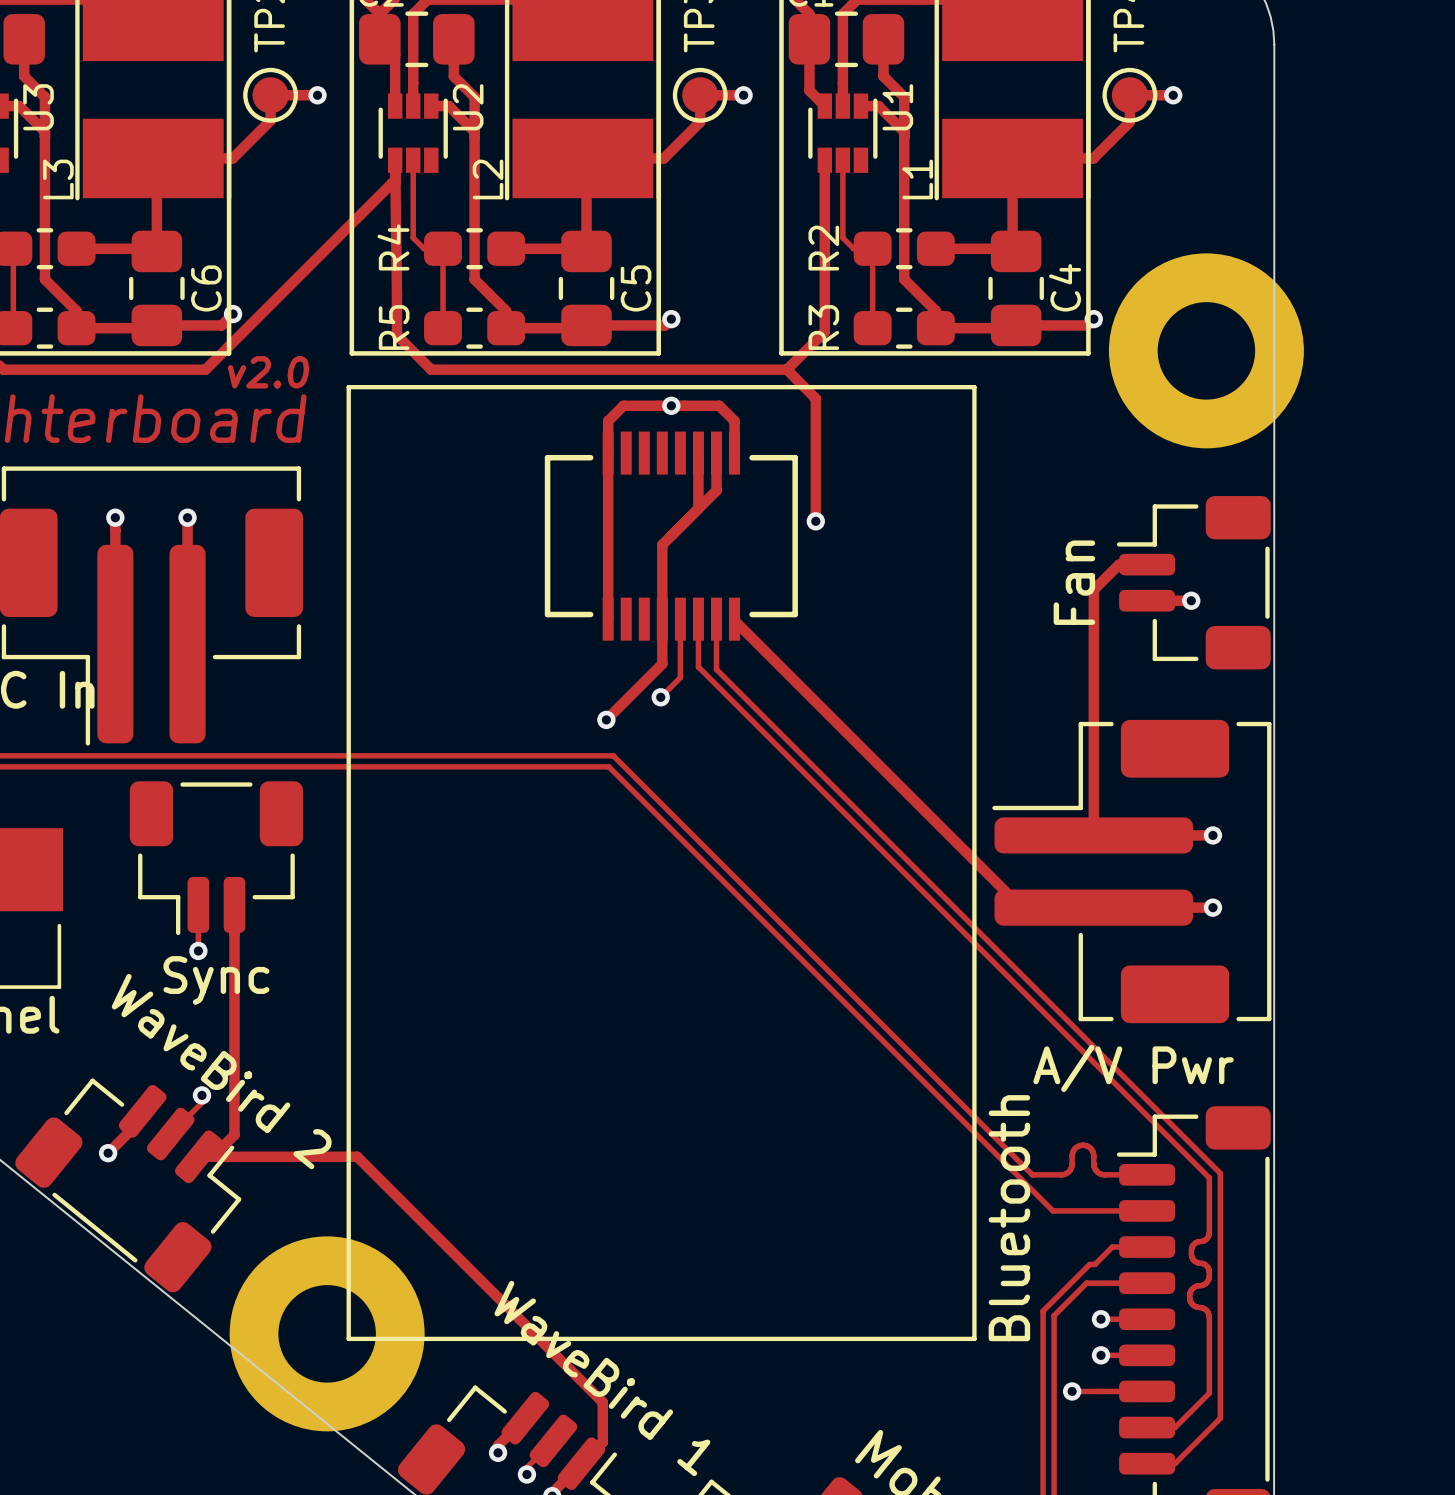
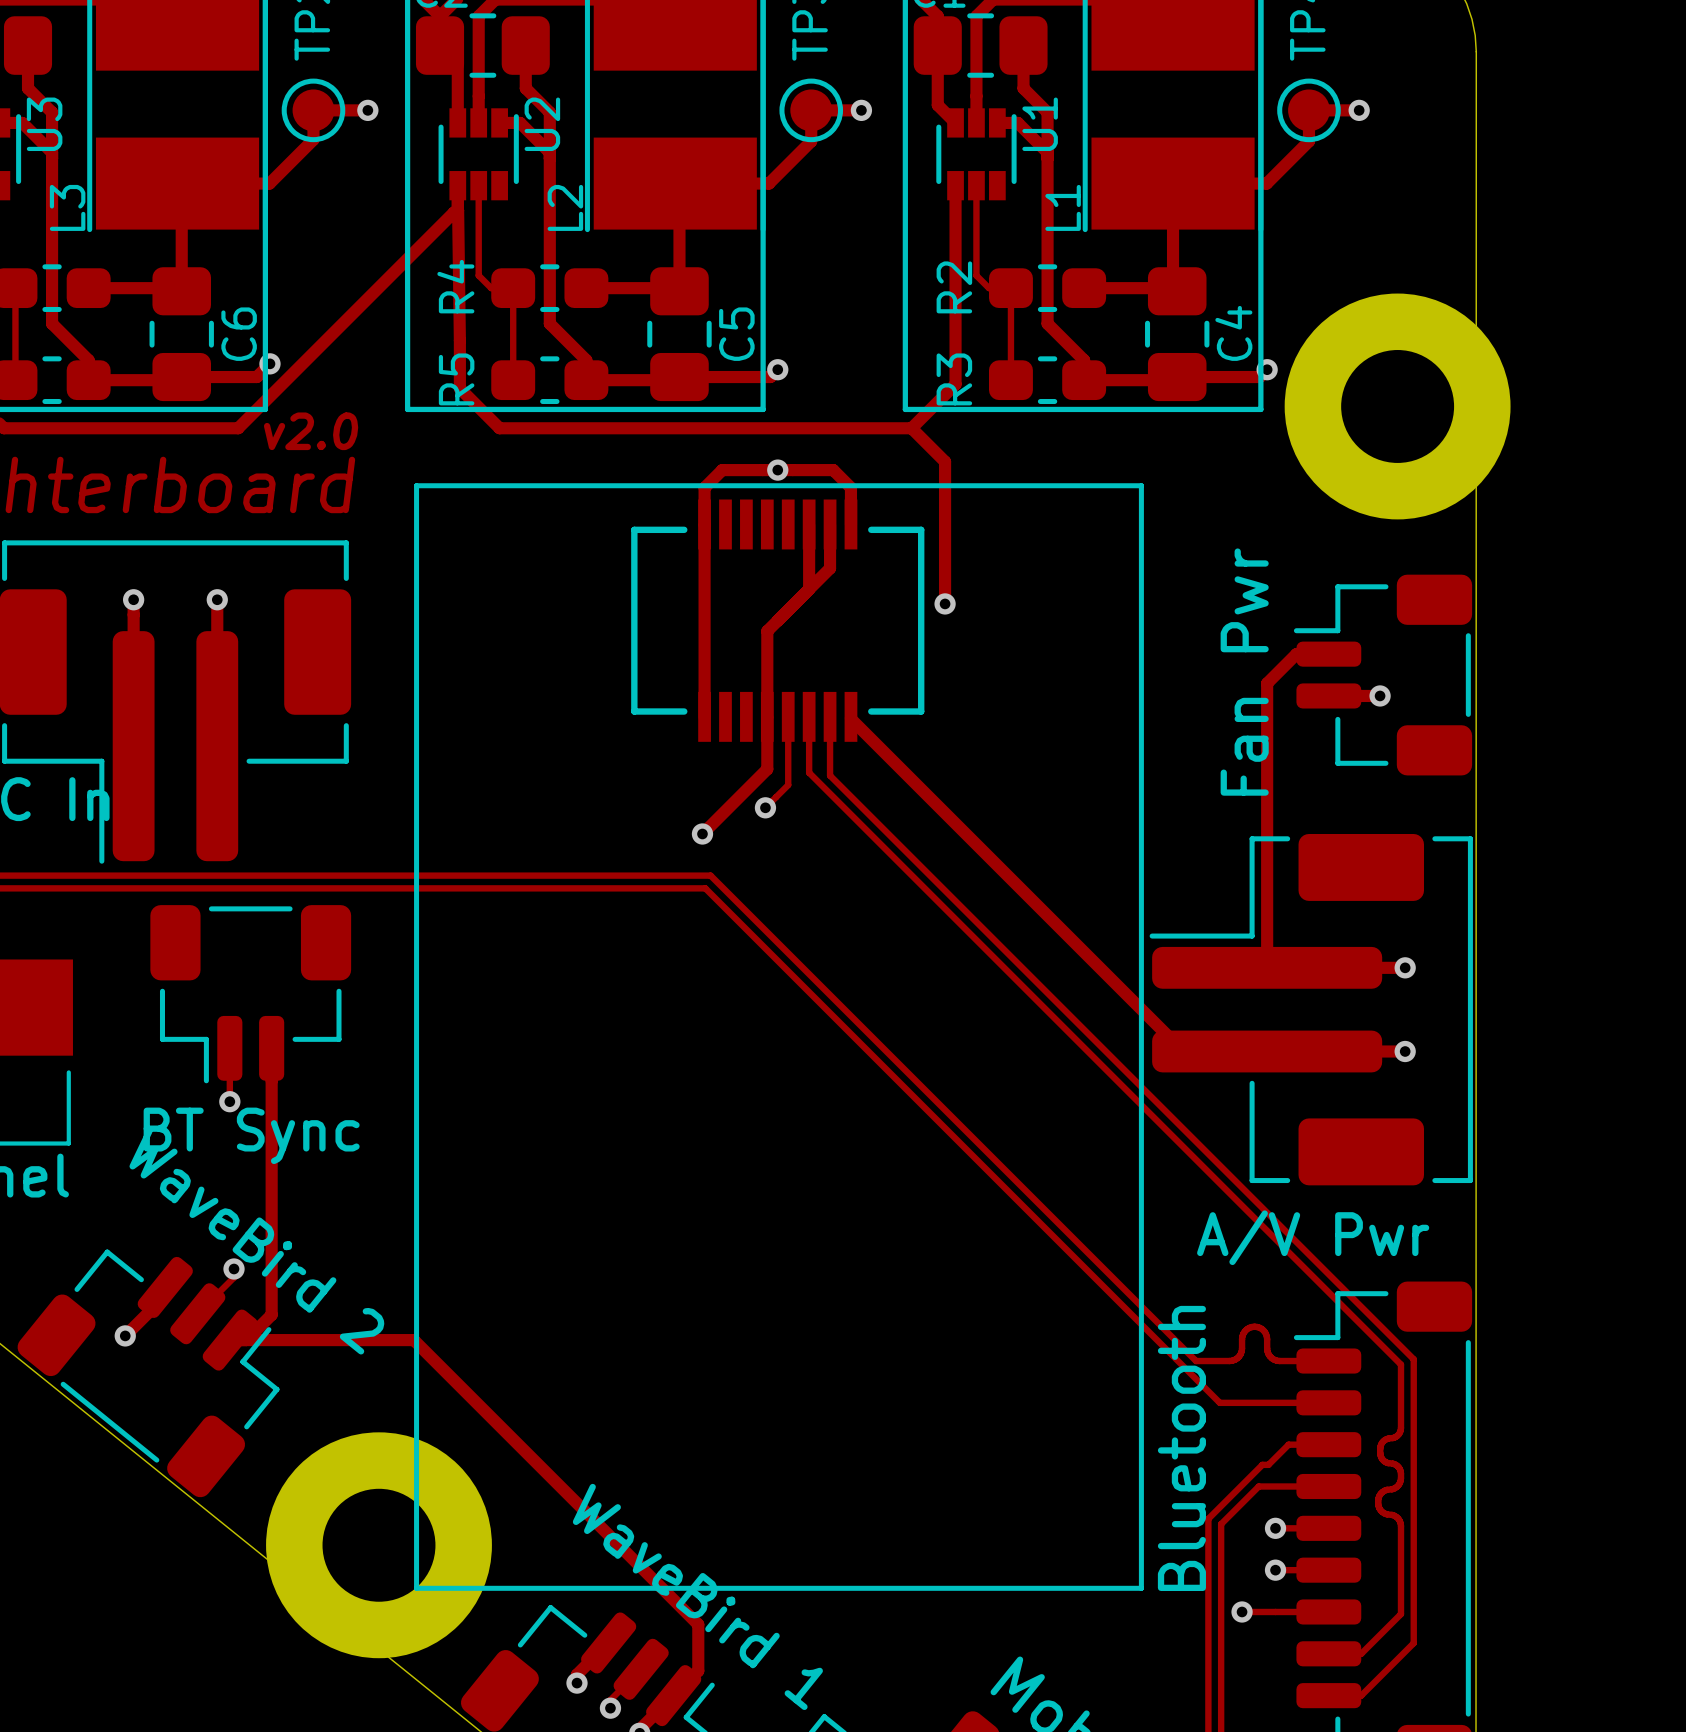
part footprint: [346, 384, 977, 1342] -> [414, 483, 1144, 1591]
part value: Fan (1074, 582) -> Fan Pwr (1244, 672)
part value: Sync (216, 980) -> BT Sync (251, 1135)
part value position: Bluetooth (1009, 1218) -> Bluetooth (1181, 1448)

